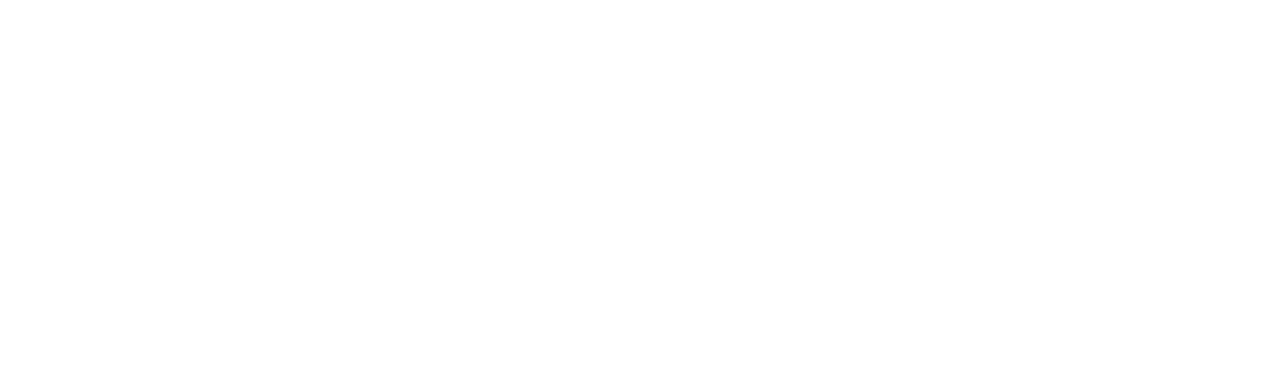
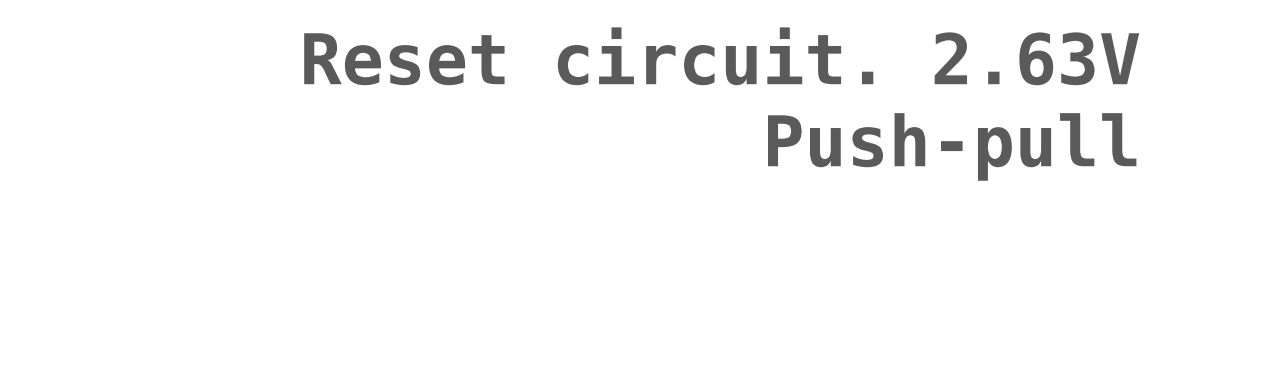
text: none -> Reset circuit. 2.63V (721, 56)
text: none -> Push-pull (952, 146)

